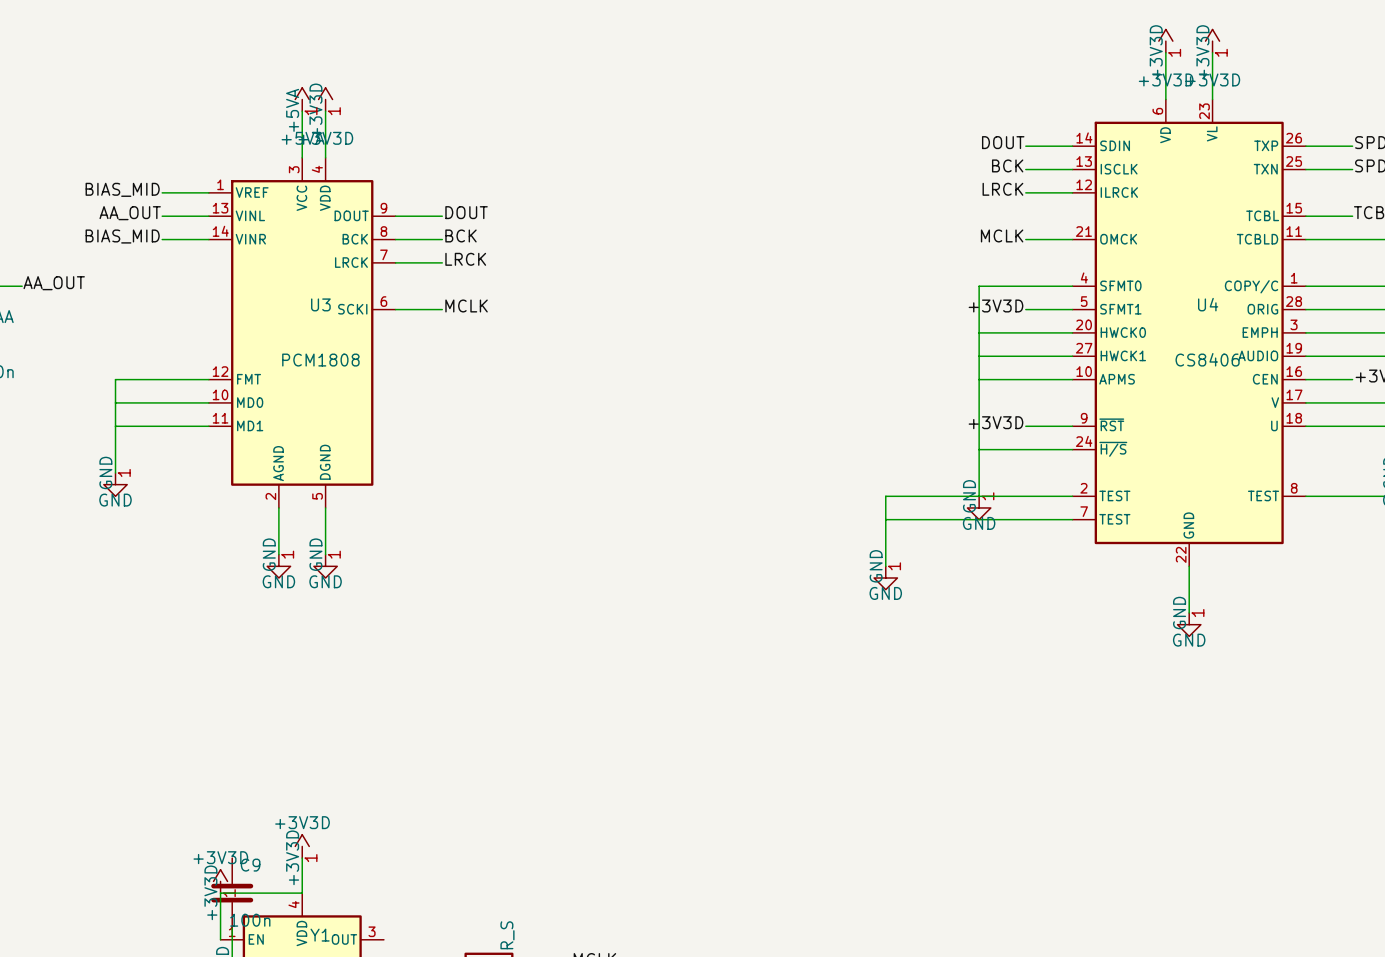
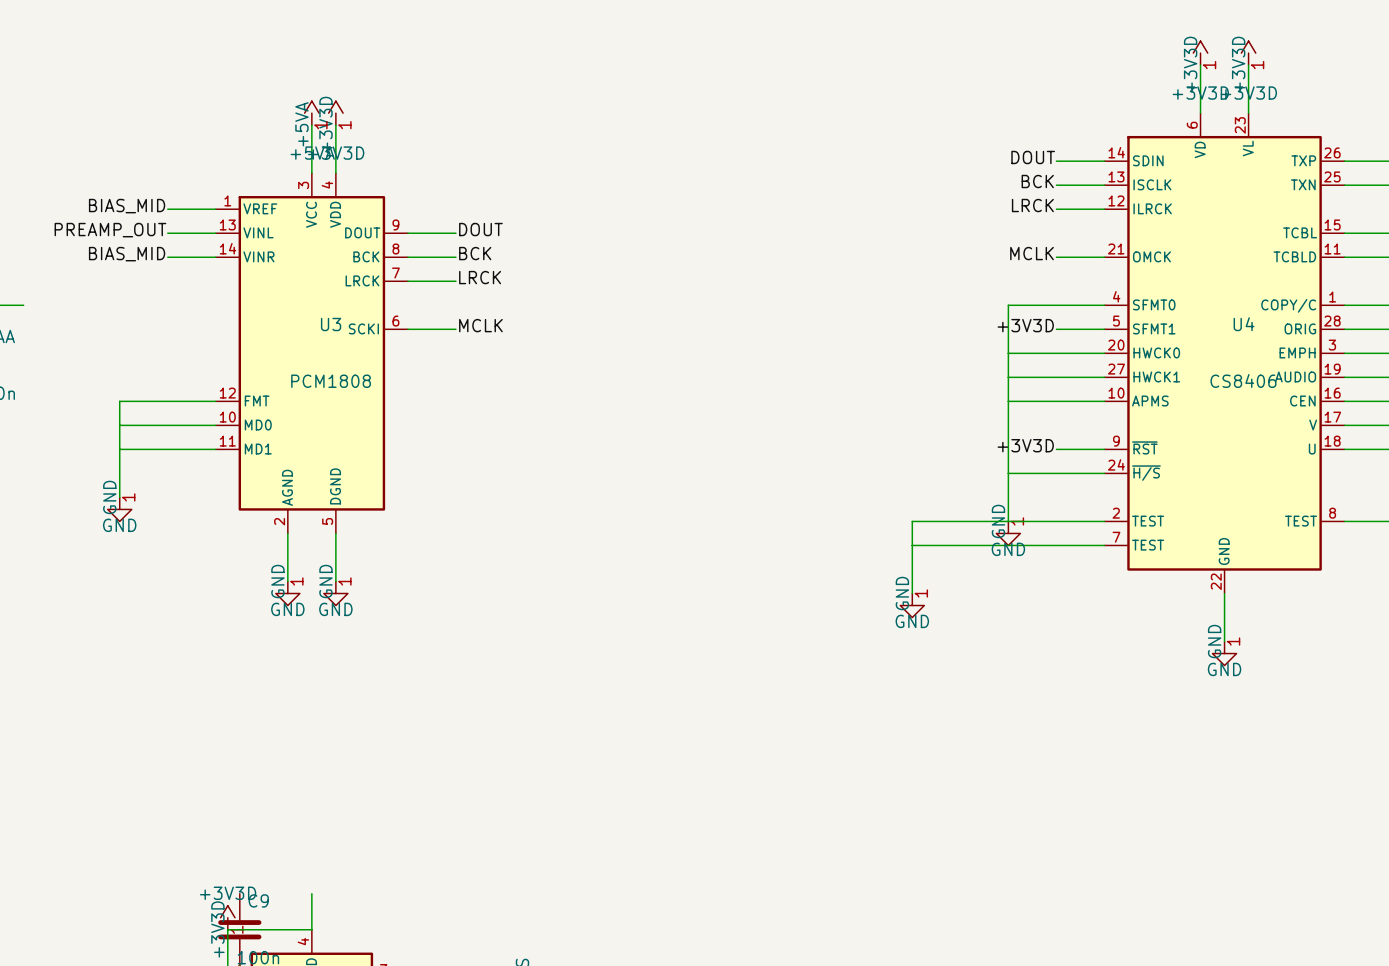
label: AA_OUT (130, 213) -> PREAMP_OUT (110, 230)
label: AA_OUT (54, 283) -> none
power symbol: +3V3D (302, 846) -> none

